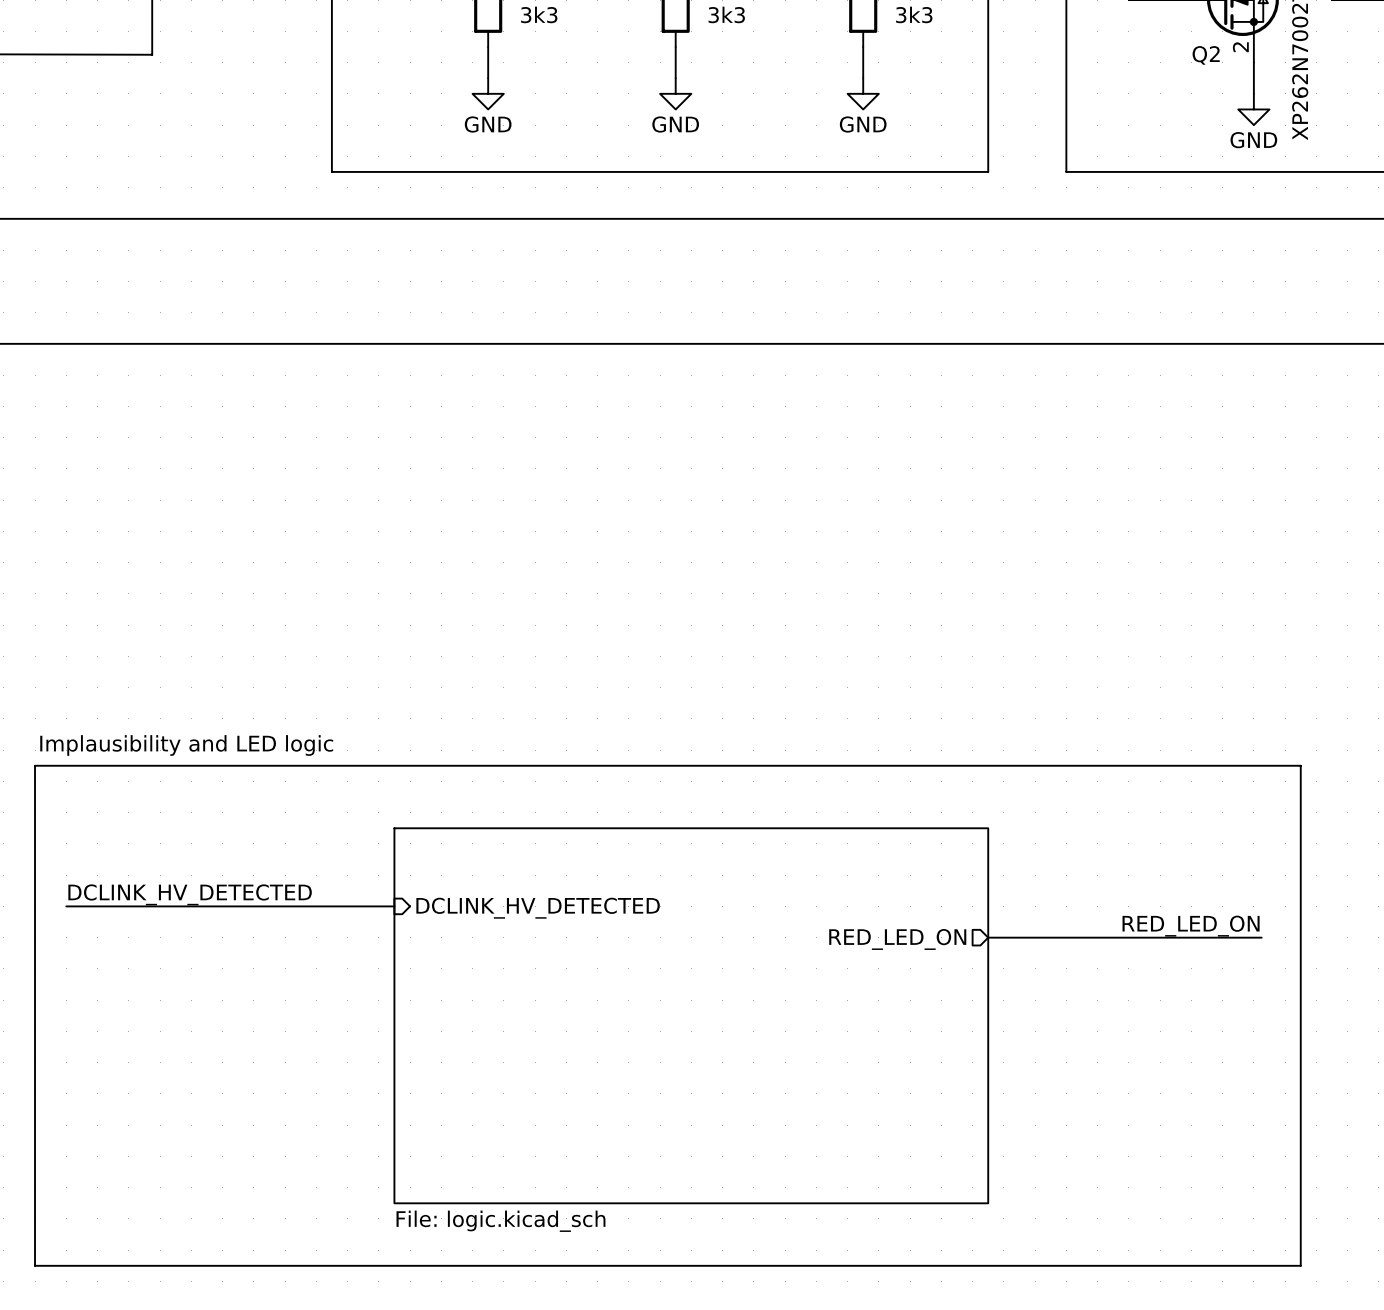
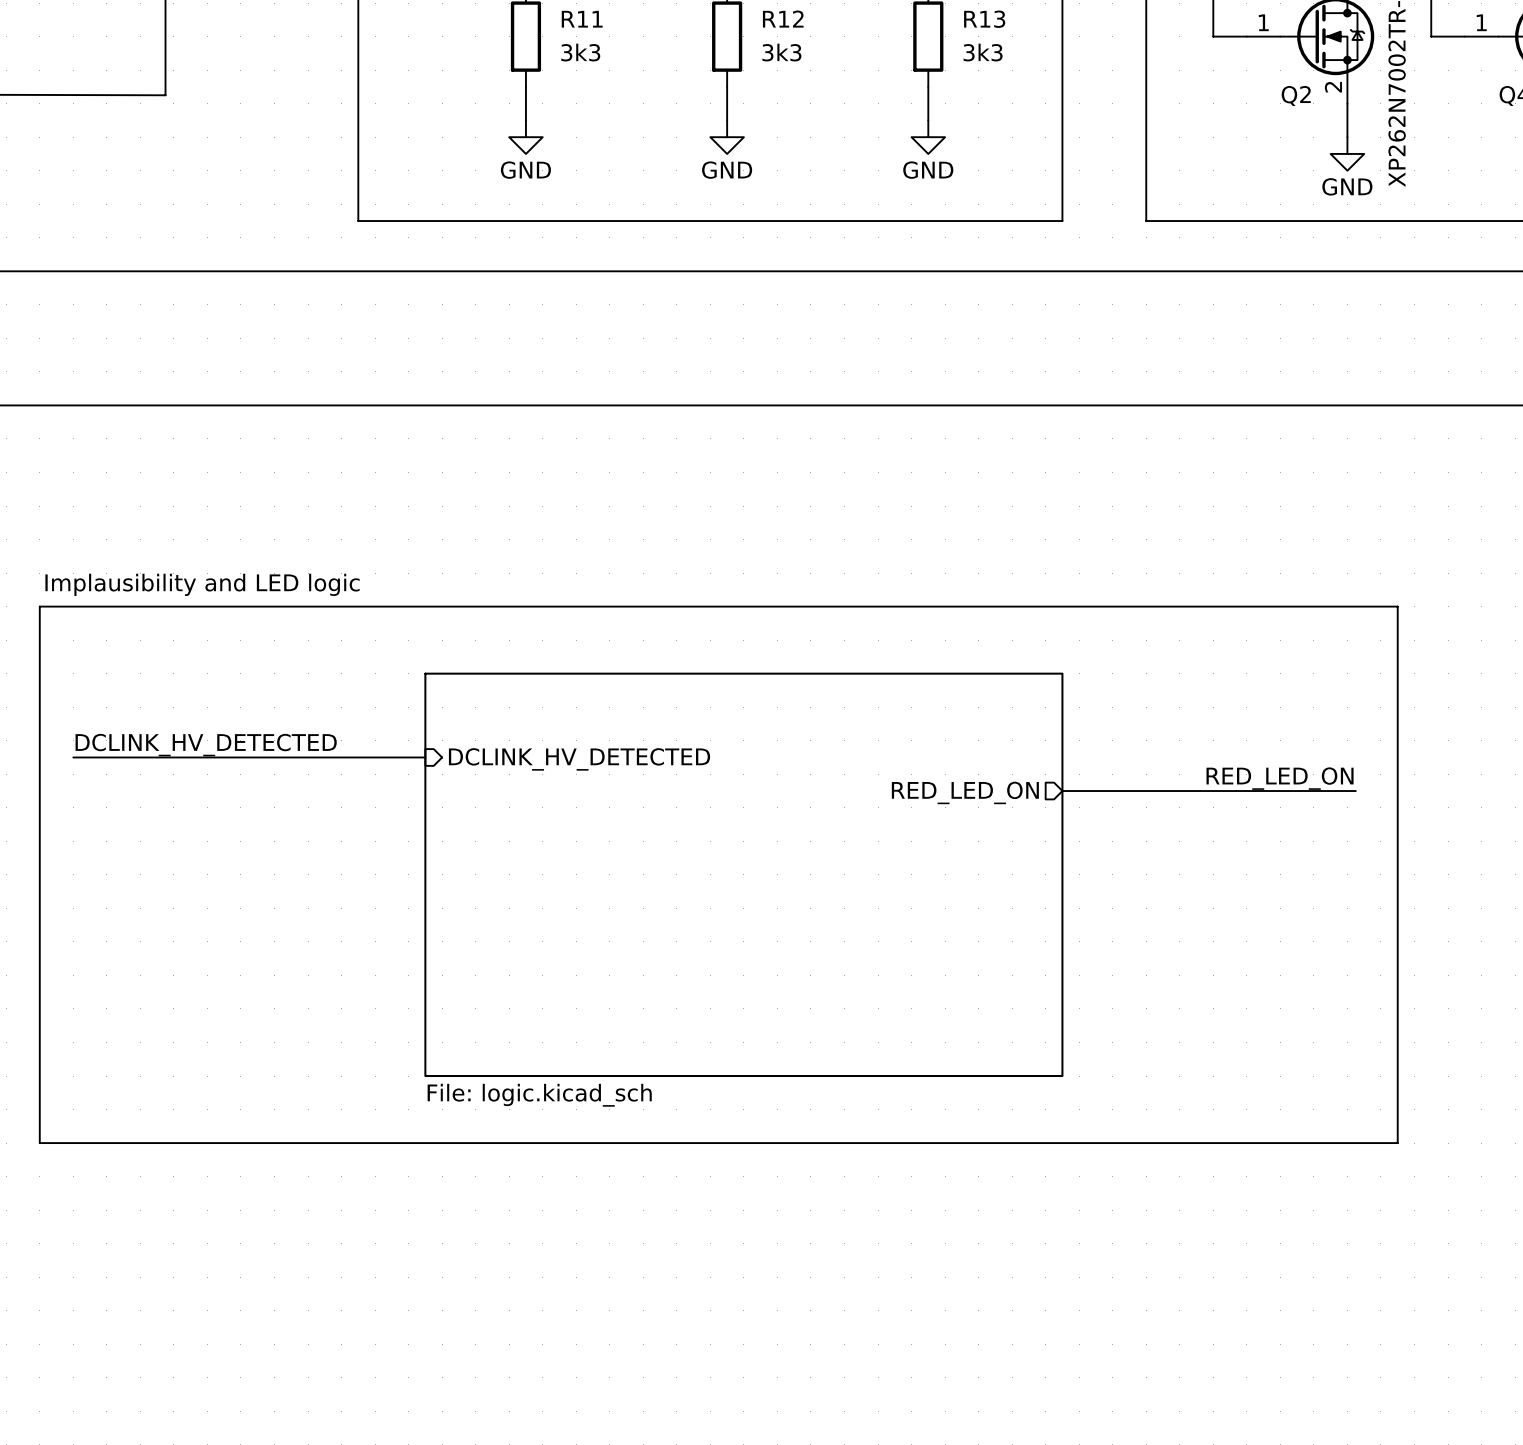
text position: Implausibility and LED logic (186, 745) -> Implausibility and LED logic (202, 584)
line: (35, 765) (1300, 765) -> (39, 858) (39, 606) (1397, 606) (1397, 858)
label position: DCLINK_HV_DETECTED (190, 894) -> DCLINK_HV_DETECTED (206, 745)
wire: (66, 906) (394, 906) -> (73, 757) (425, 757)
sheet pin position: DCLINK_HV_DETECTED (538, 908) -> DCLINK_HV_DETECTED (579, 759)
label position: RED_LED_ON (1191, 926) -> RED_LED_ON (1280, 778)
wire: (988, 937) (1261, 937) -> (1062, 791) (1355, 791)
sheet pin position: RED_LED_ON (897, 939) -> RED_LED_ON (965, 792)
sheet position: (691, 1015) -> (743, 874)
line: (35, 1031) (35, 1265) (1300, 1265) (1300, 1031) -> (39, 1143) (1397, 1143)

